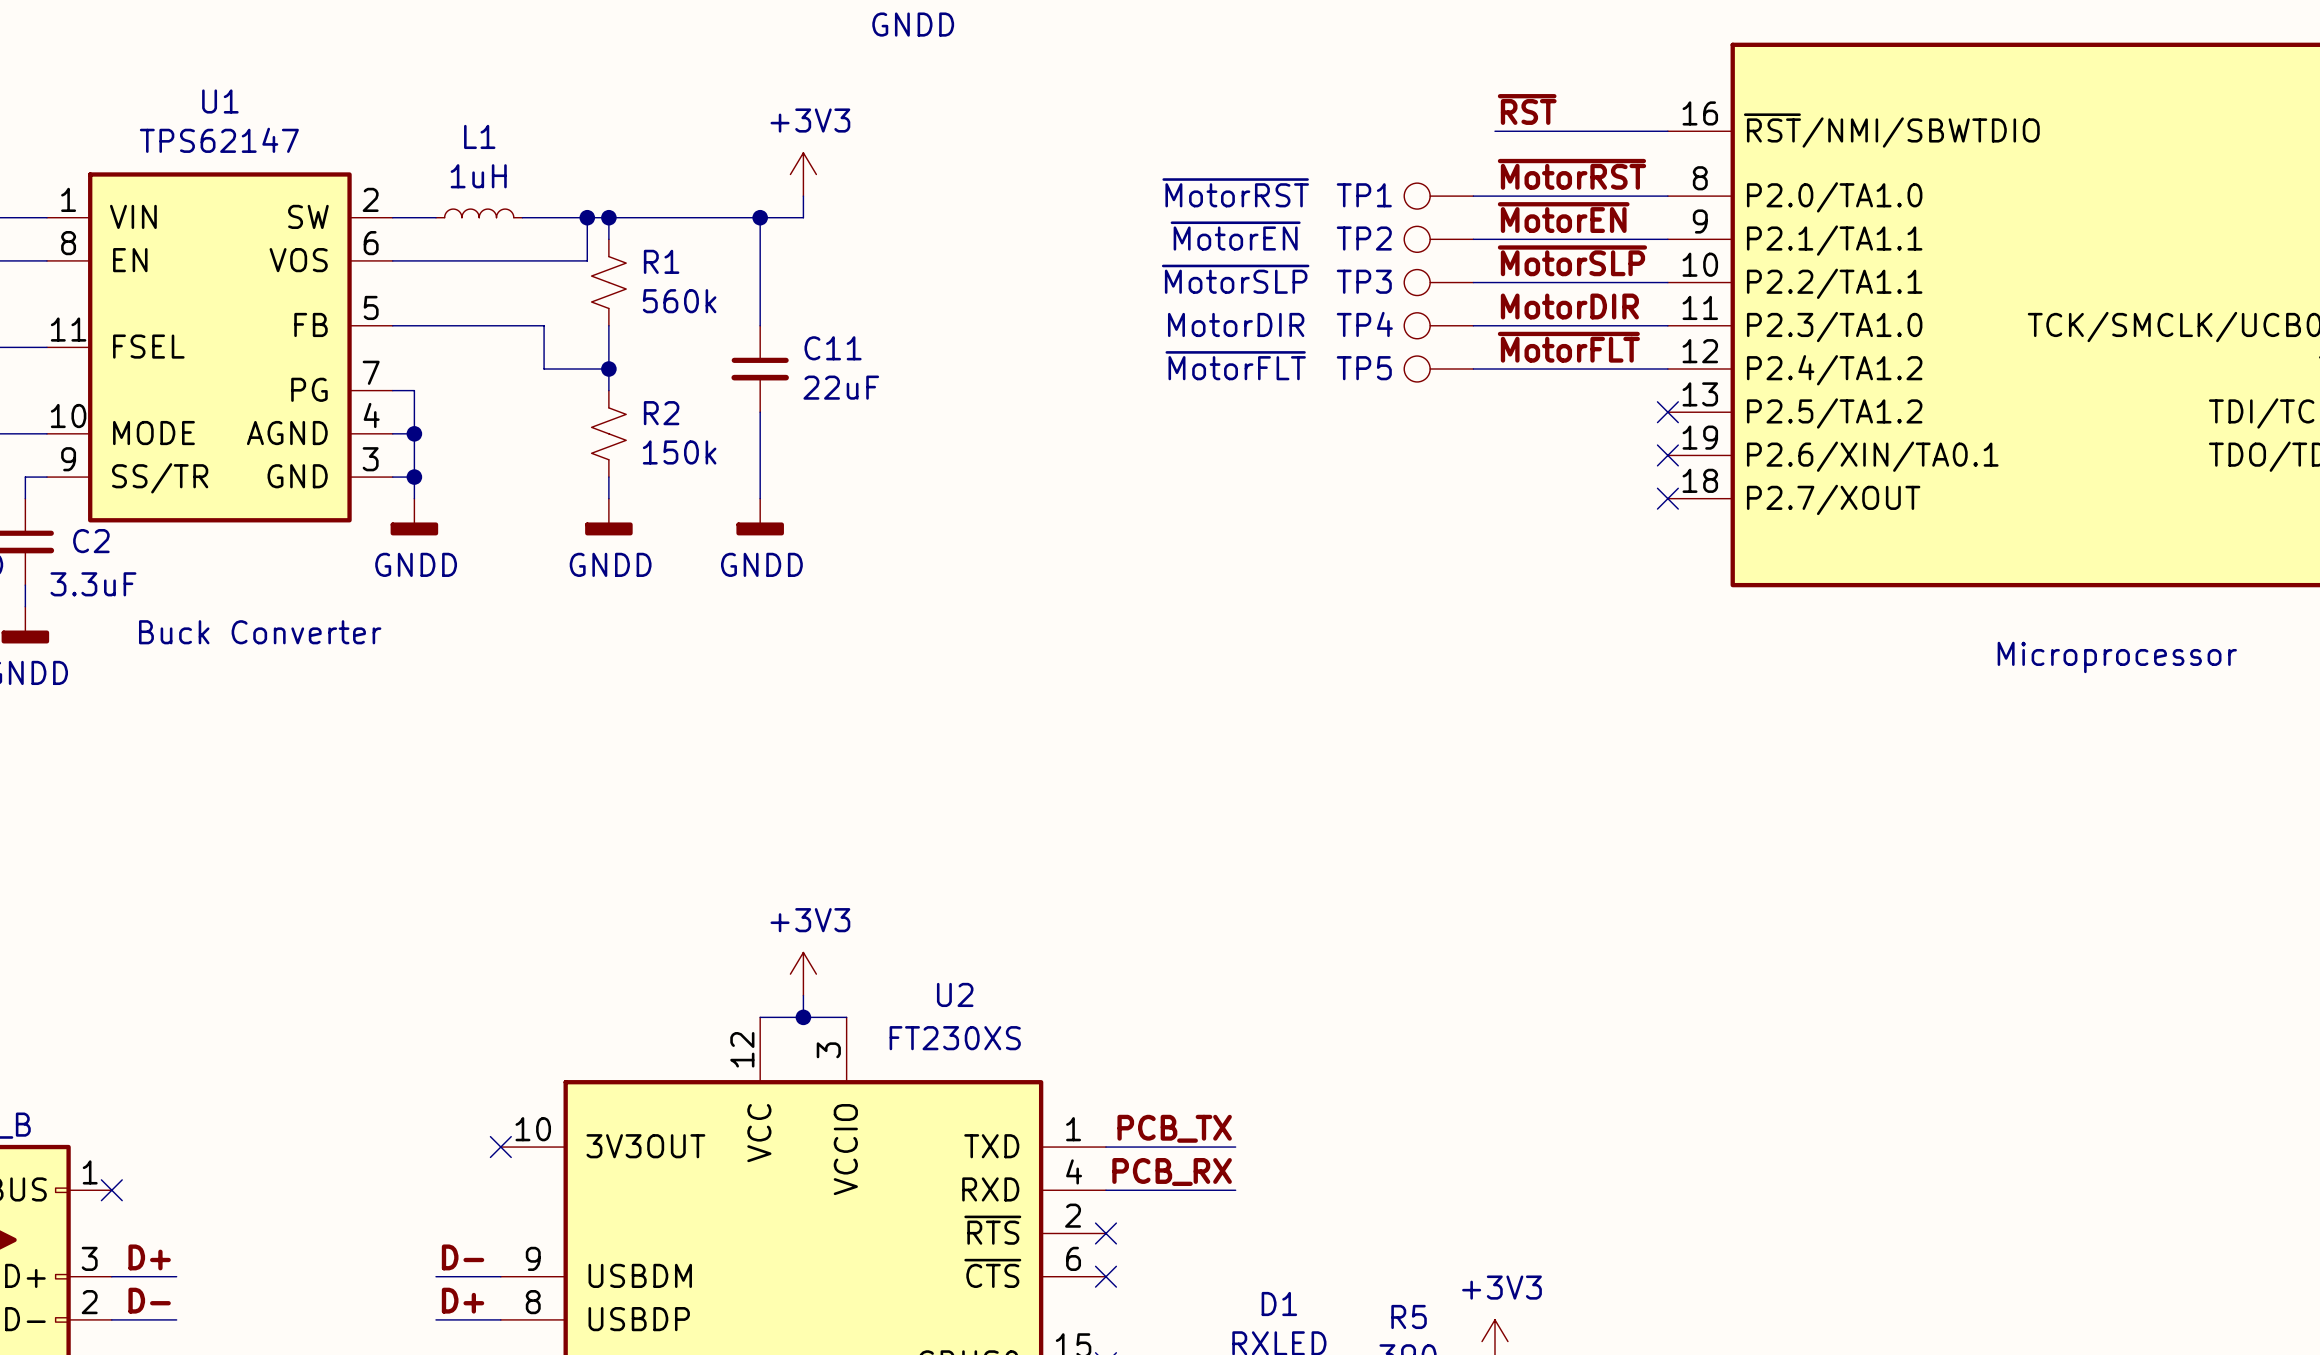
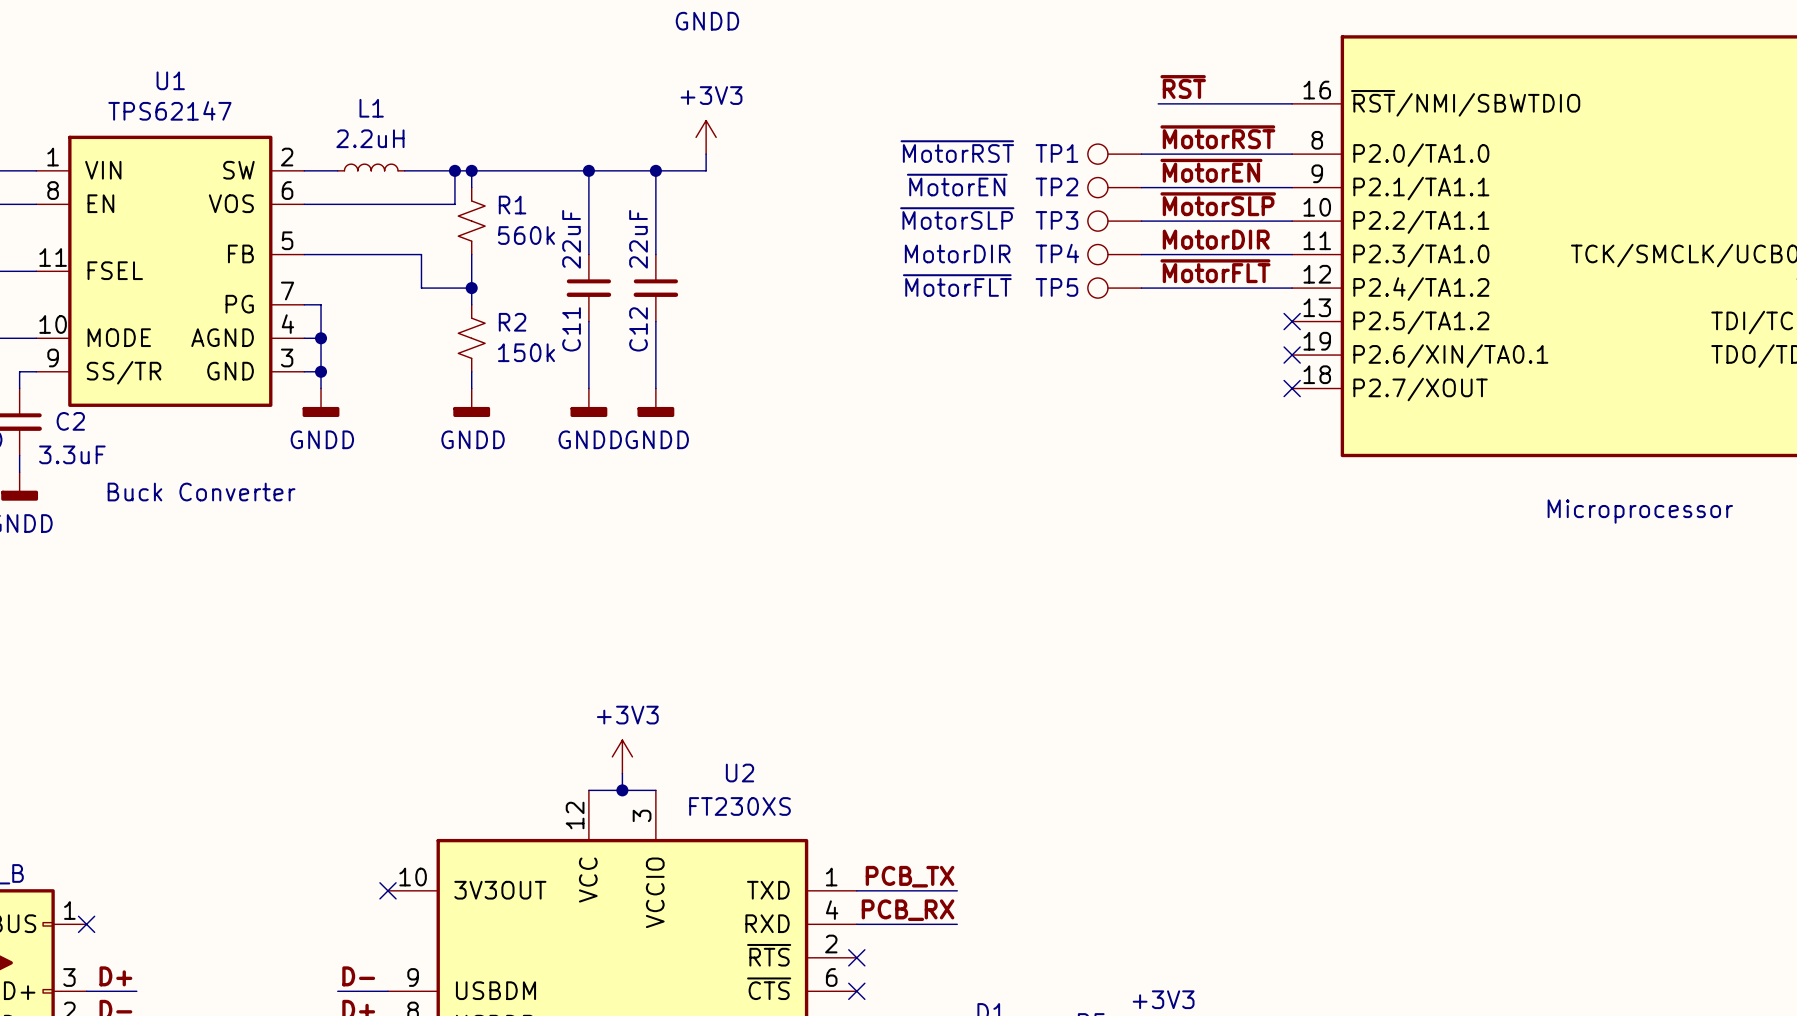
power symbol position: +3V3 (803, 174) -> +3V3 (706, 137)
L1 value: 1uH (478, 176) -> 2.2uH (370, 138)
wire: (803, 196) (803, 217) -> (706, 154) (706, 170) (622, 170)
wire: none -> (655, 170) (655, 254)
junction: none -> (655, 170)
C11 name rotation: 0° (833, 348) -> 90° counterclockwise (571, 329)
C11 name position: C11 (833, 348) -> C11 (571, 329)
C12: none -> 22uF (655, 288)
C11 value rotation: 0° (841, 387) -> 90° counterclockwise (571, 239)
C11 value position: 22uF (841, 387) -> 22uF (571, 239)
wire: none -> (655, 321) (655, 388)
power symbol: none -> GNDD (655, 402)

